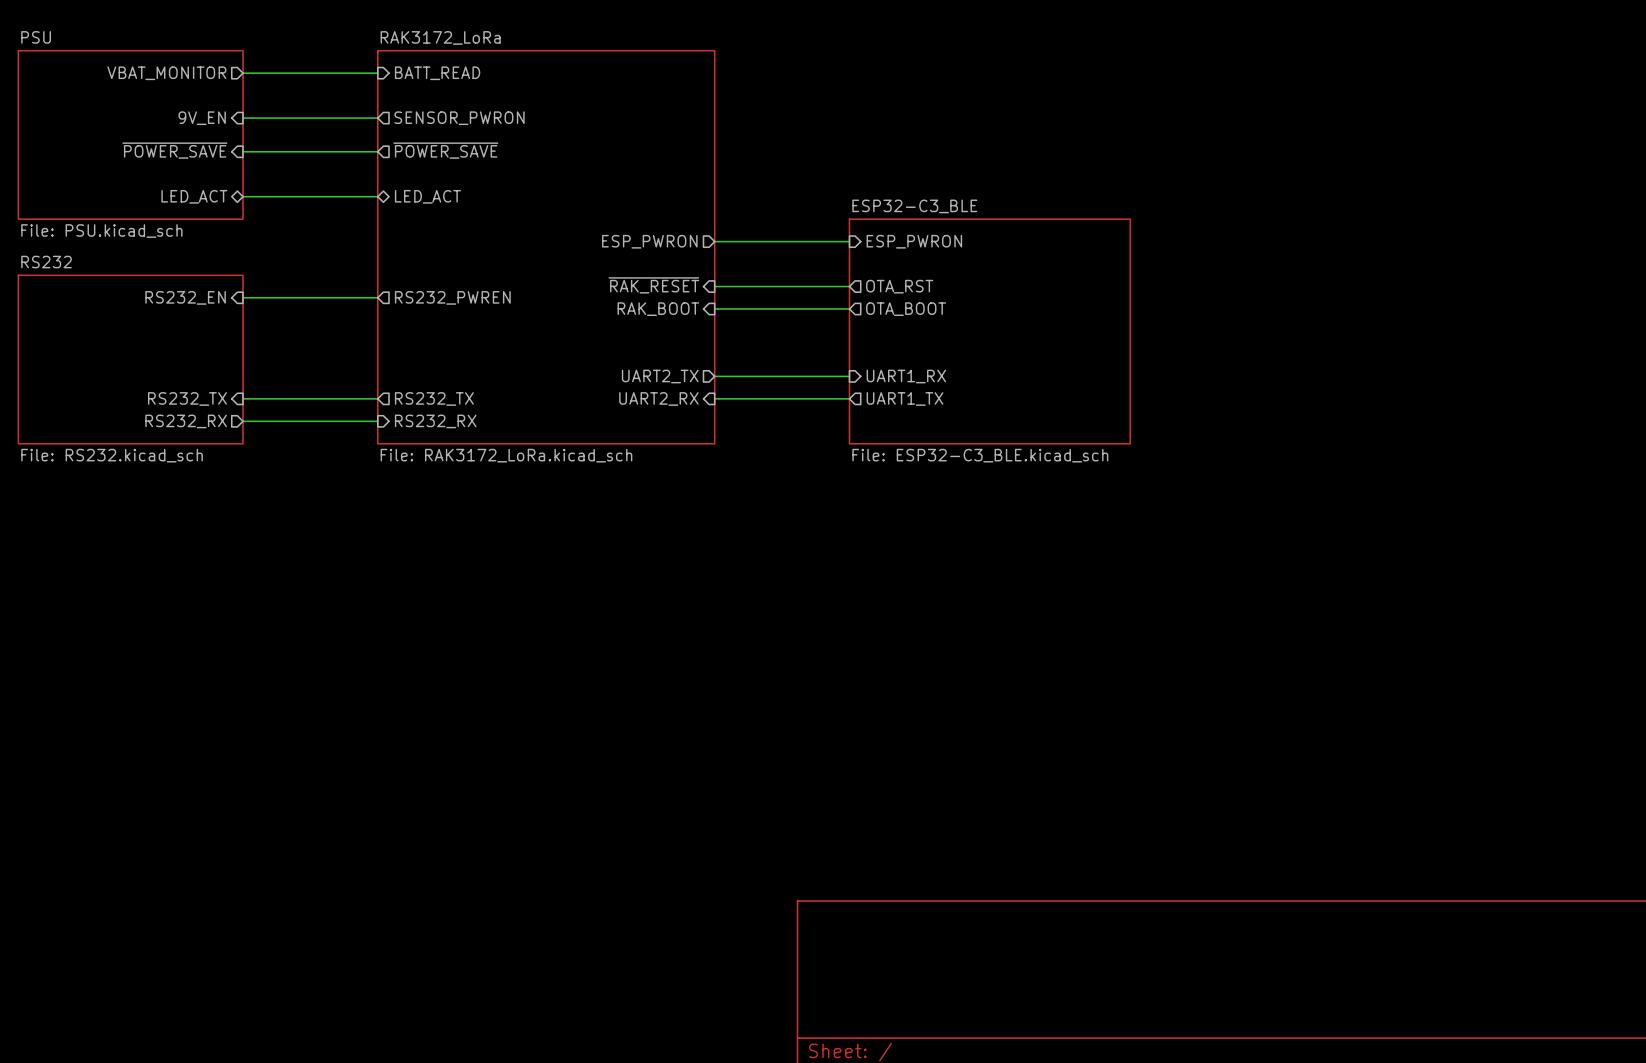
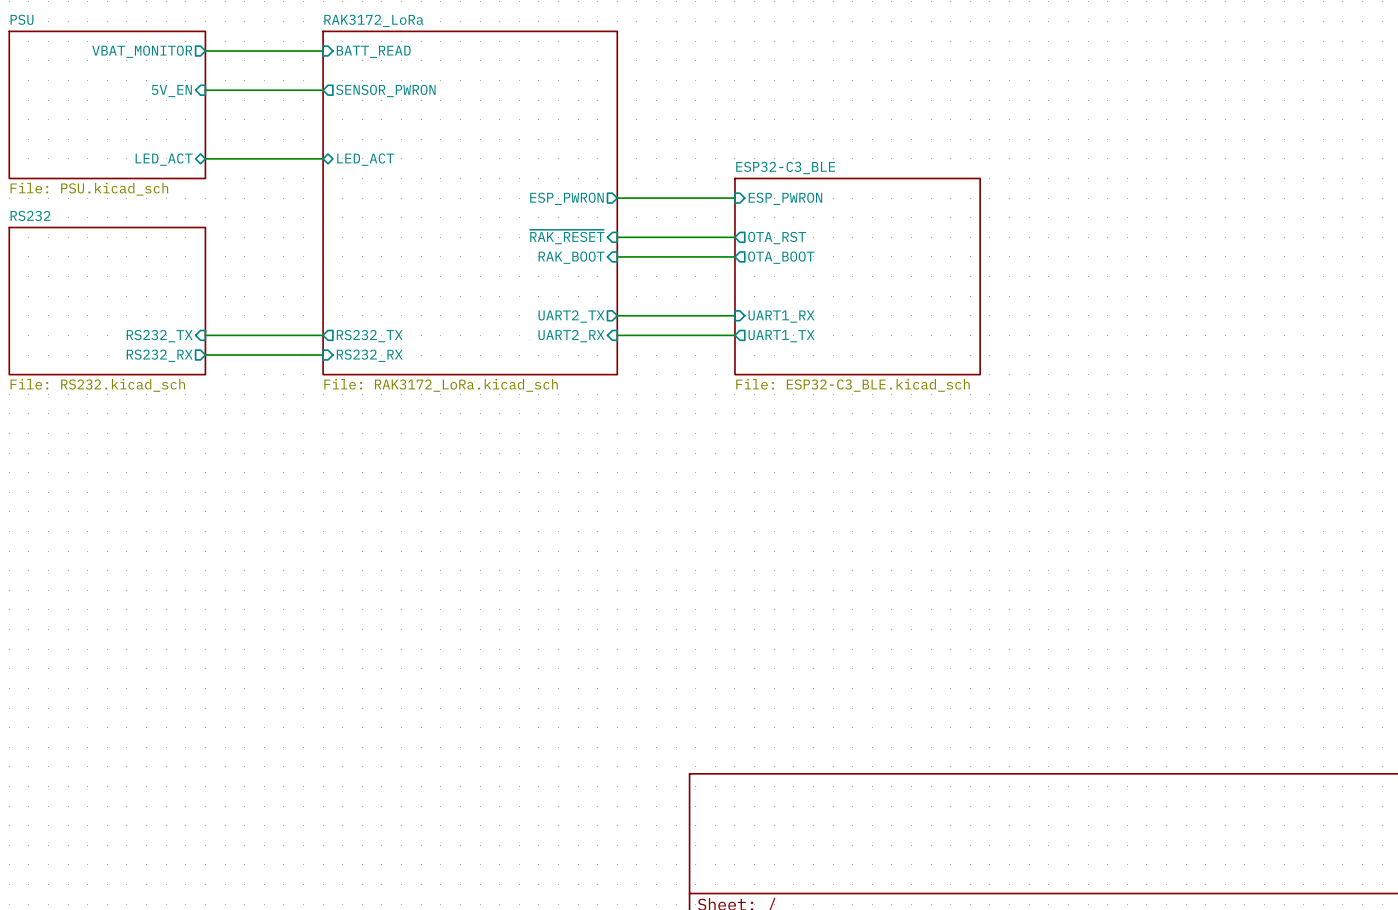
sheet pin: 9V_EN (202, 118) -> 5V_EN (171, 91)
sheet pin: ~{POWER_SAVE} (174, 150) -> none
sheet pin: ~{POWER_SAVE} (445, 150) -> none
wire: (242, 151) (377, 151) -> none
sheet pin: RS232_EN (185, 297) -> none
wire: (242, 297) (377, 297) -> none
sheet pin: RS232_PWREN (452, 297) -> none

